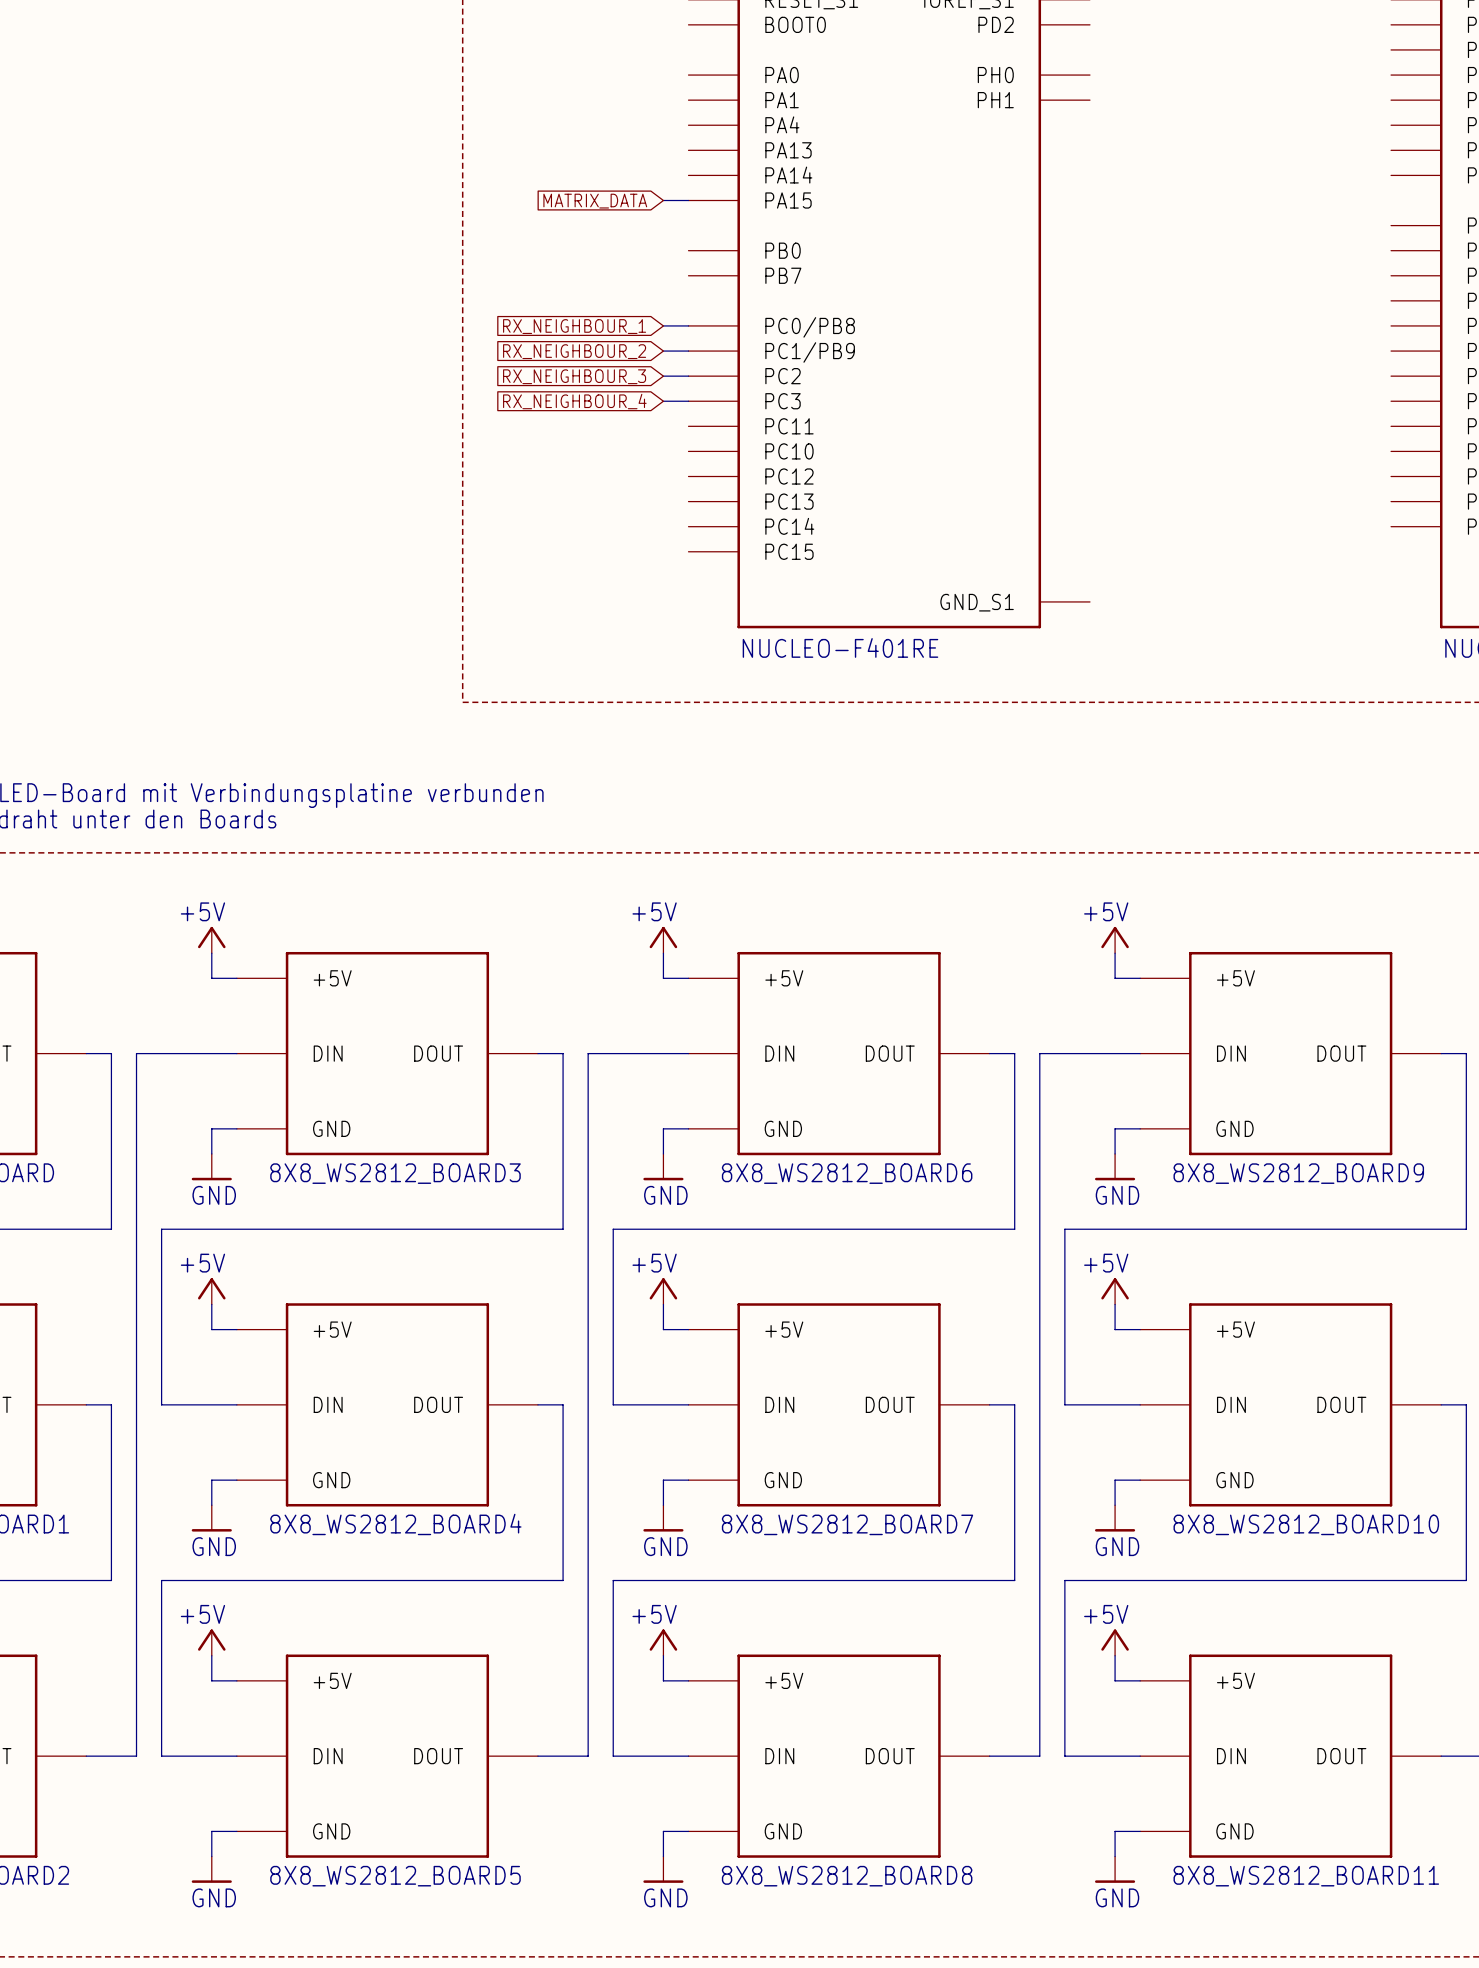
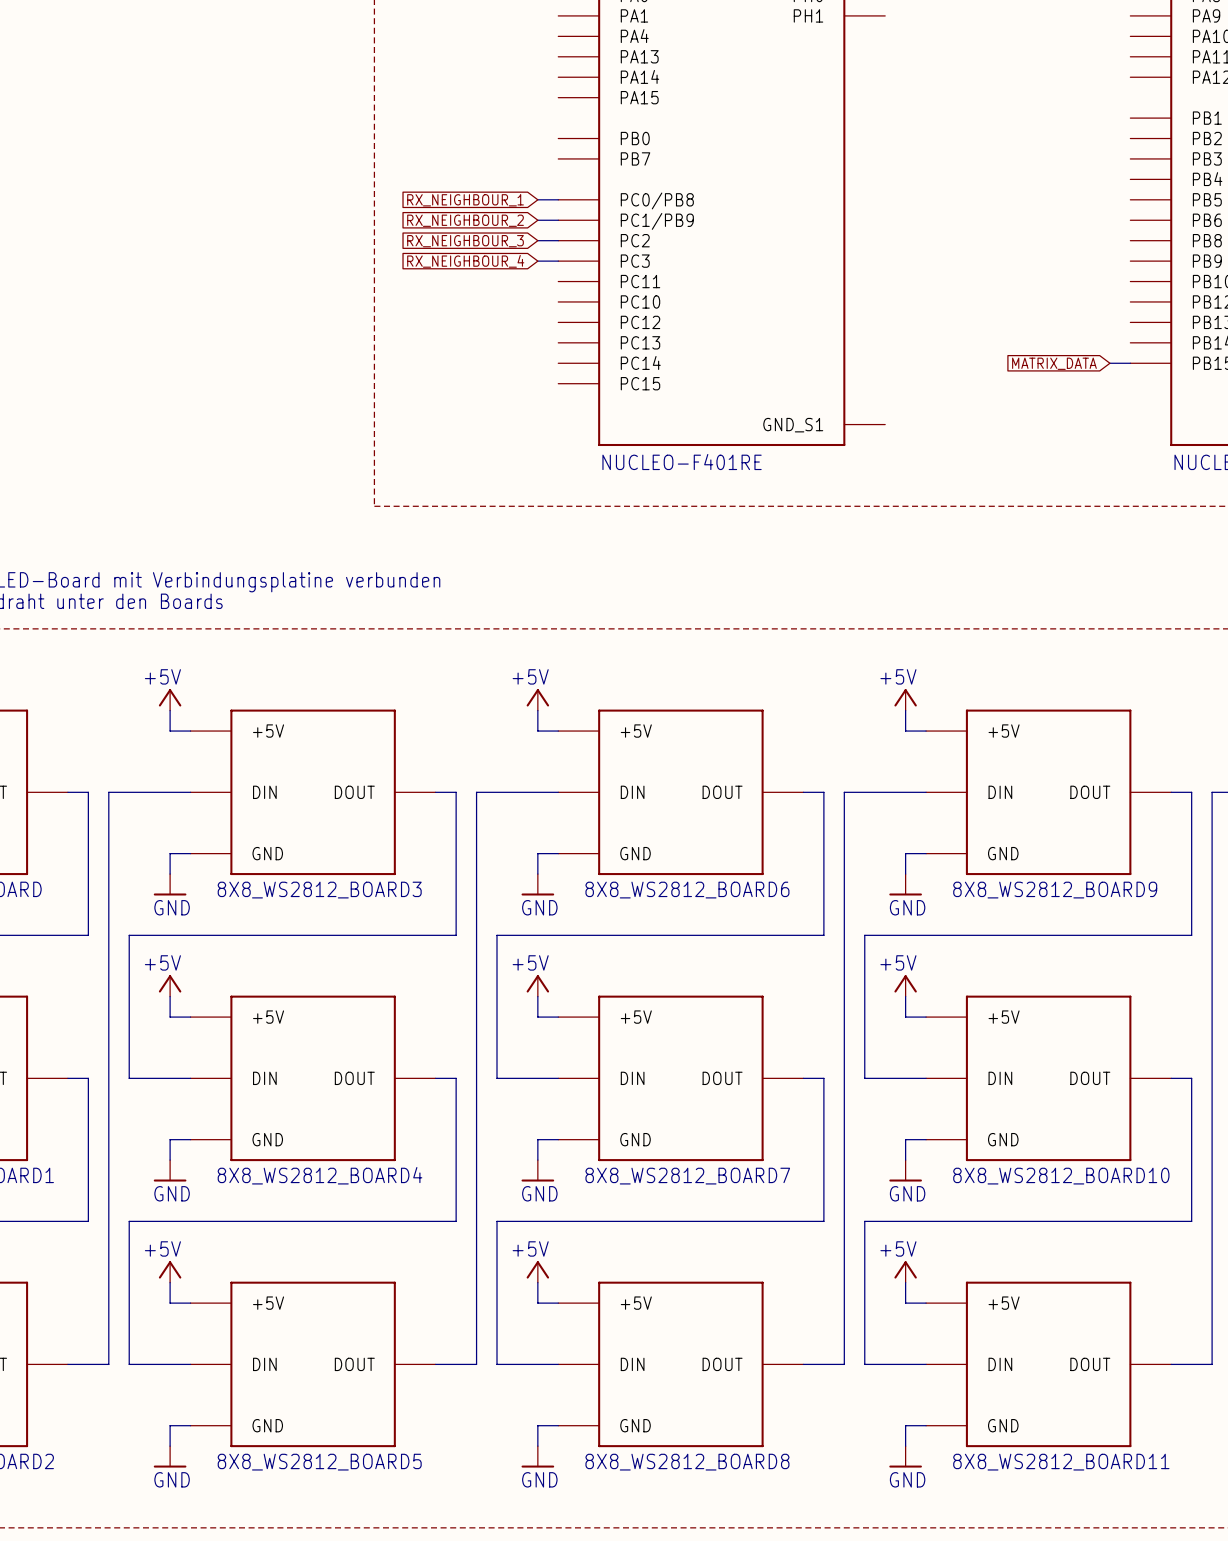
wire: (663, 200) (688, 200) -> none
global label: MATRIX_DATA (595, 201) -> none
wire: none -> (1109, 363) (1130, 363)
global label: none -> MATRIX_DATA (1054, 363)

